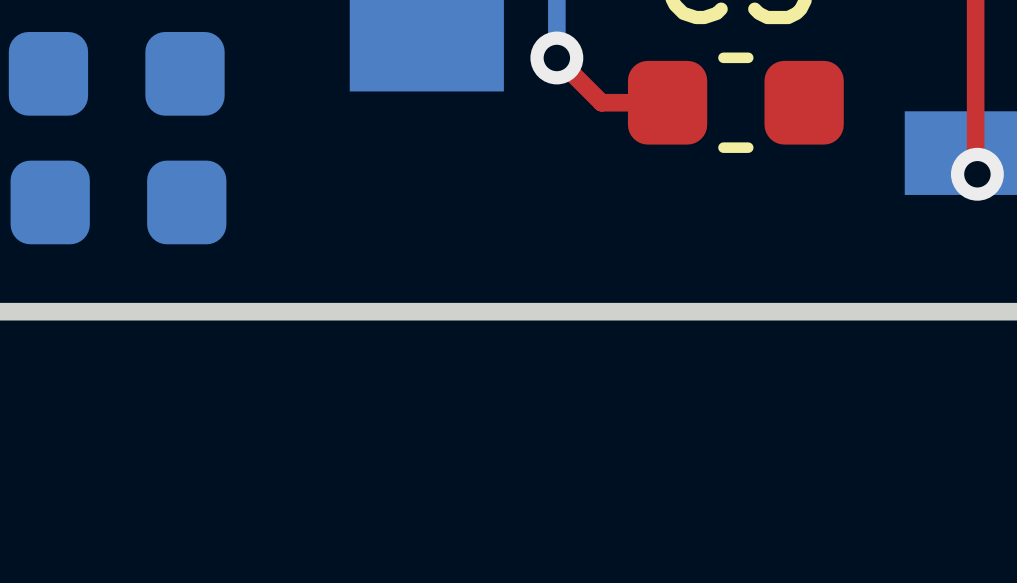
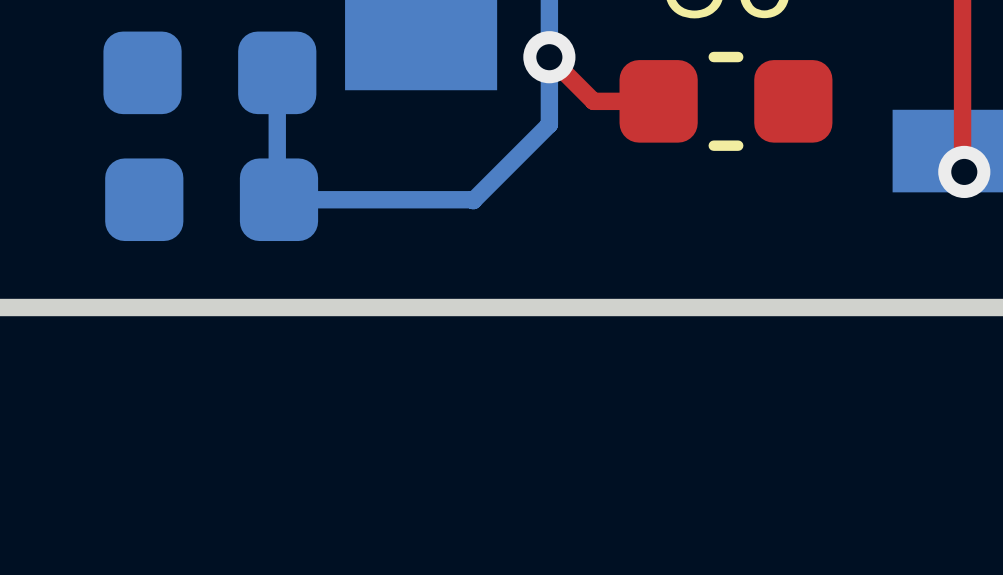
bottom track: none -> (549, 57) (549, 124) (473, 200)
part: (116, 73) -> none
part: none -> (209, 72)
bottom track: none -> (277, 72) (277, 198) (278, 199) (472, 199)
part: (118, 202) -> none
part: none -> (211, 199)

